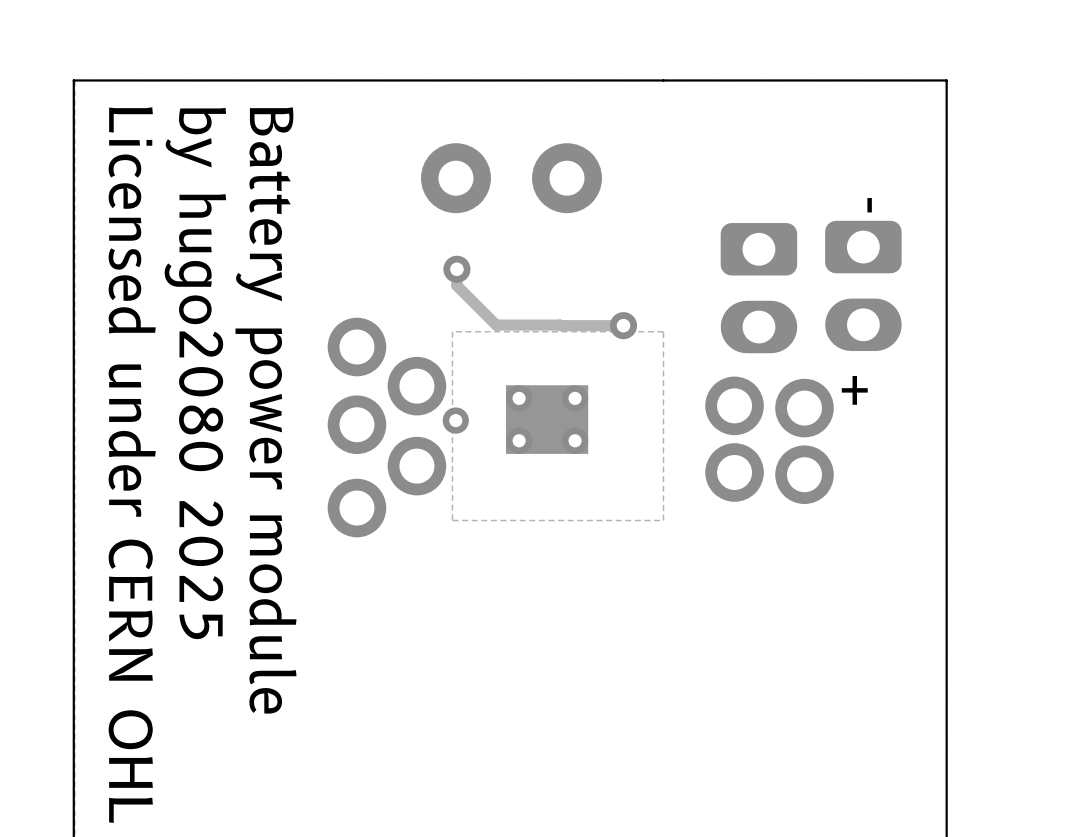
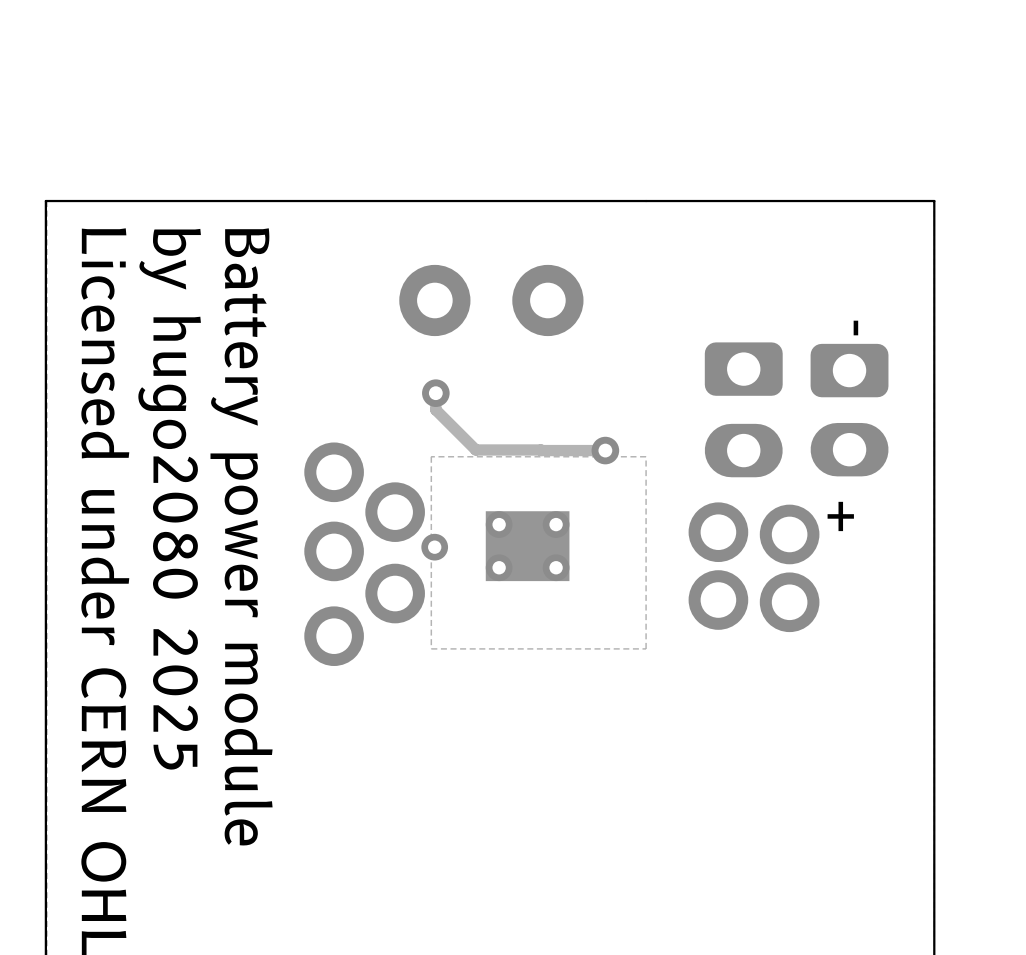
part: (758, 249) -> none
part: none -> (743, 409)
part: (758, 327) -> none

